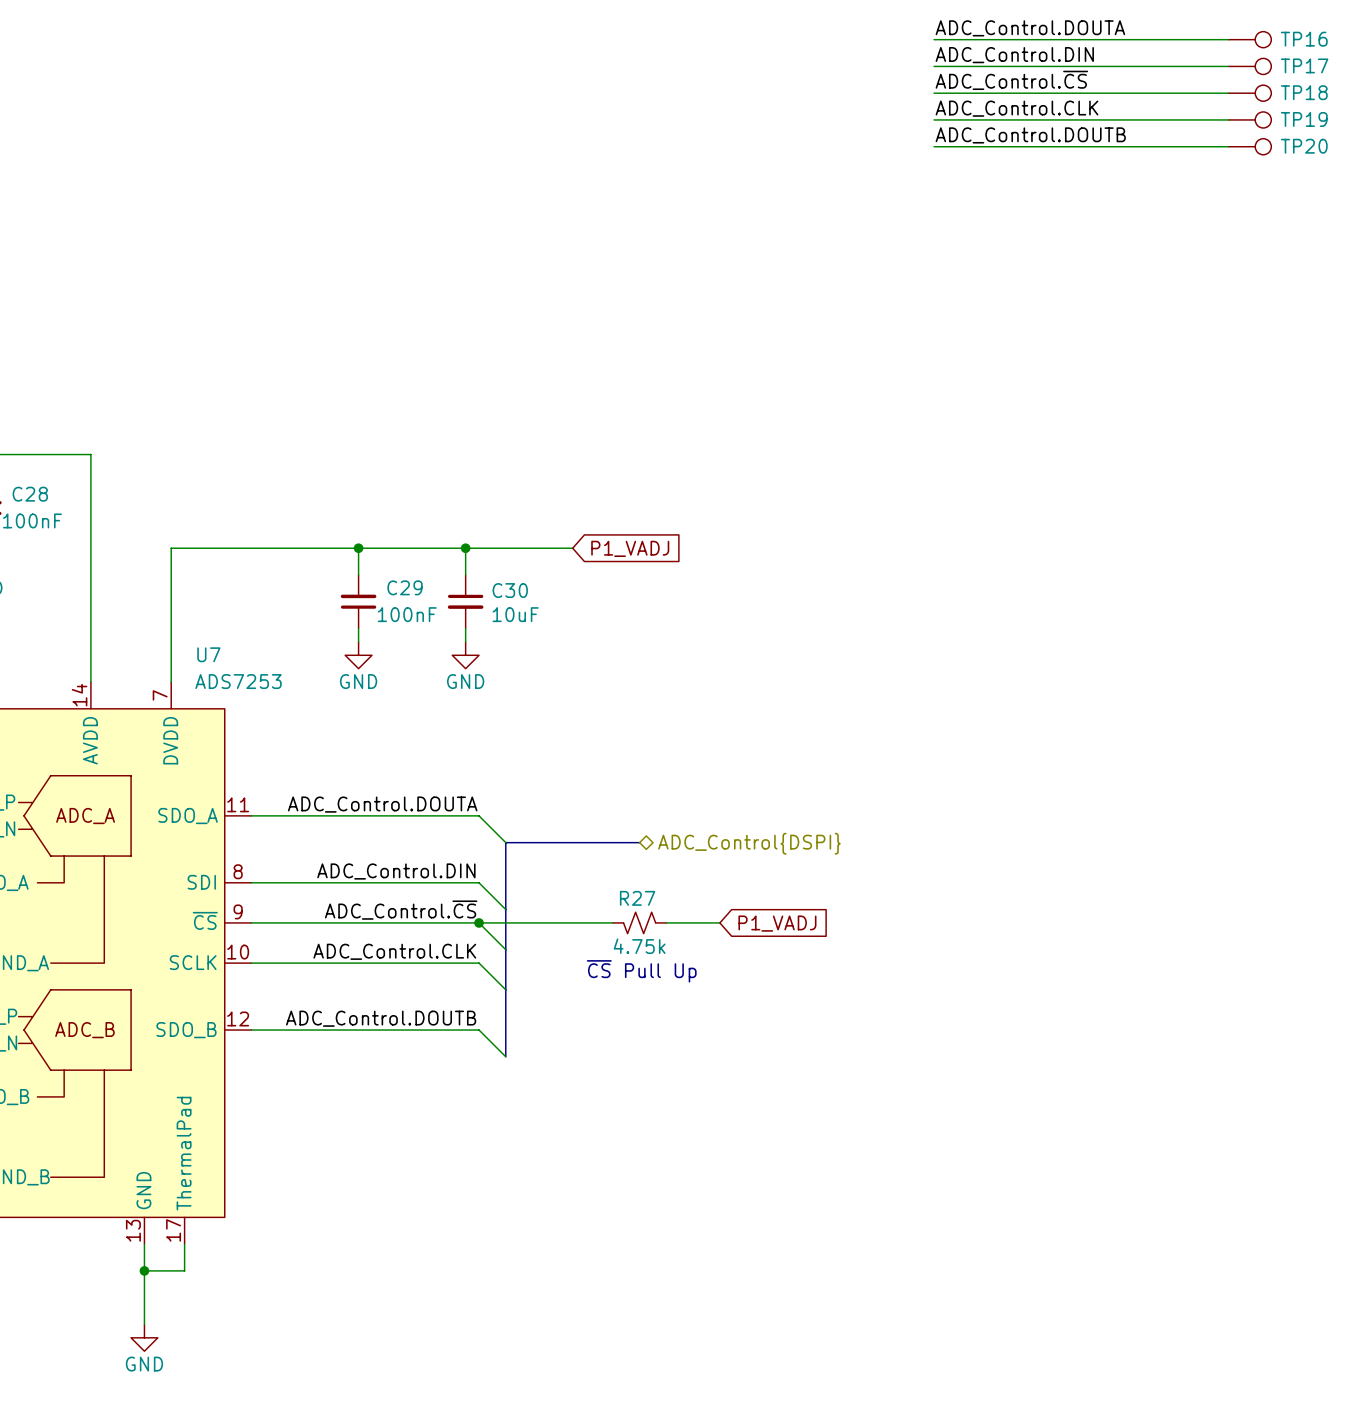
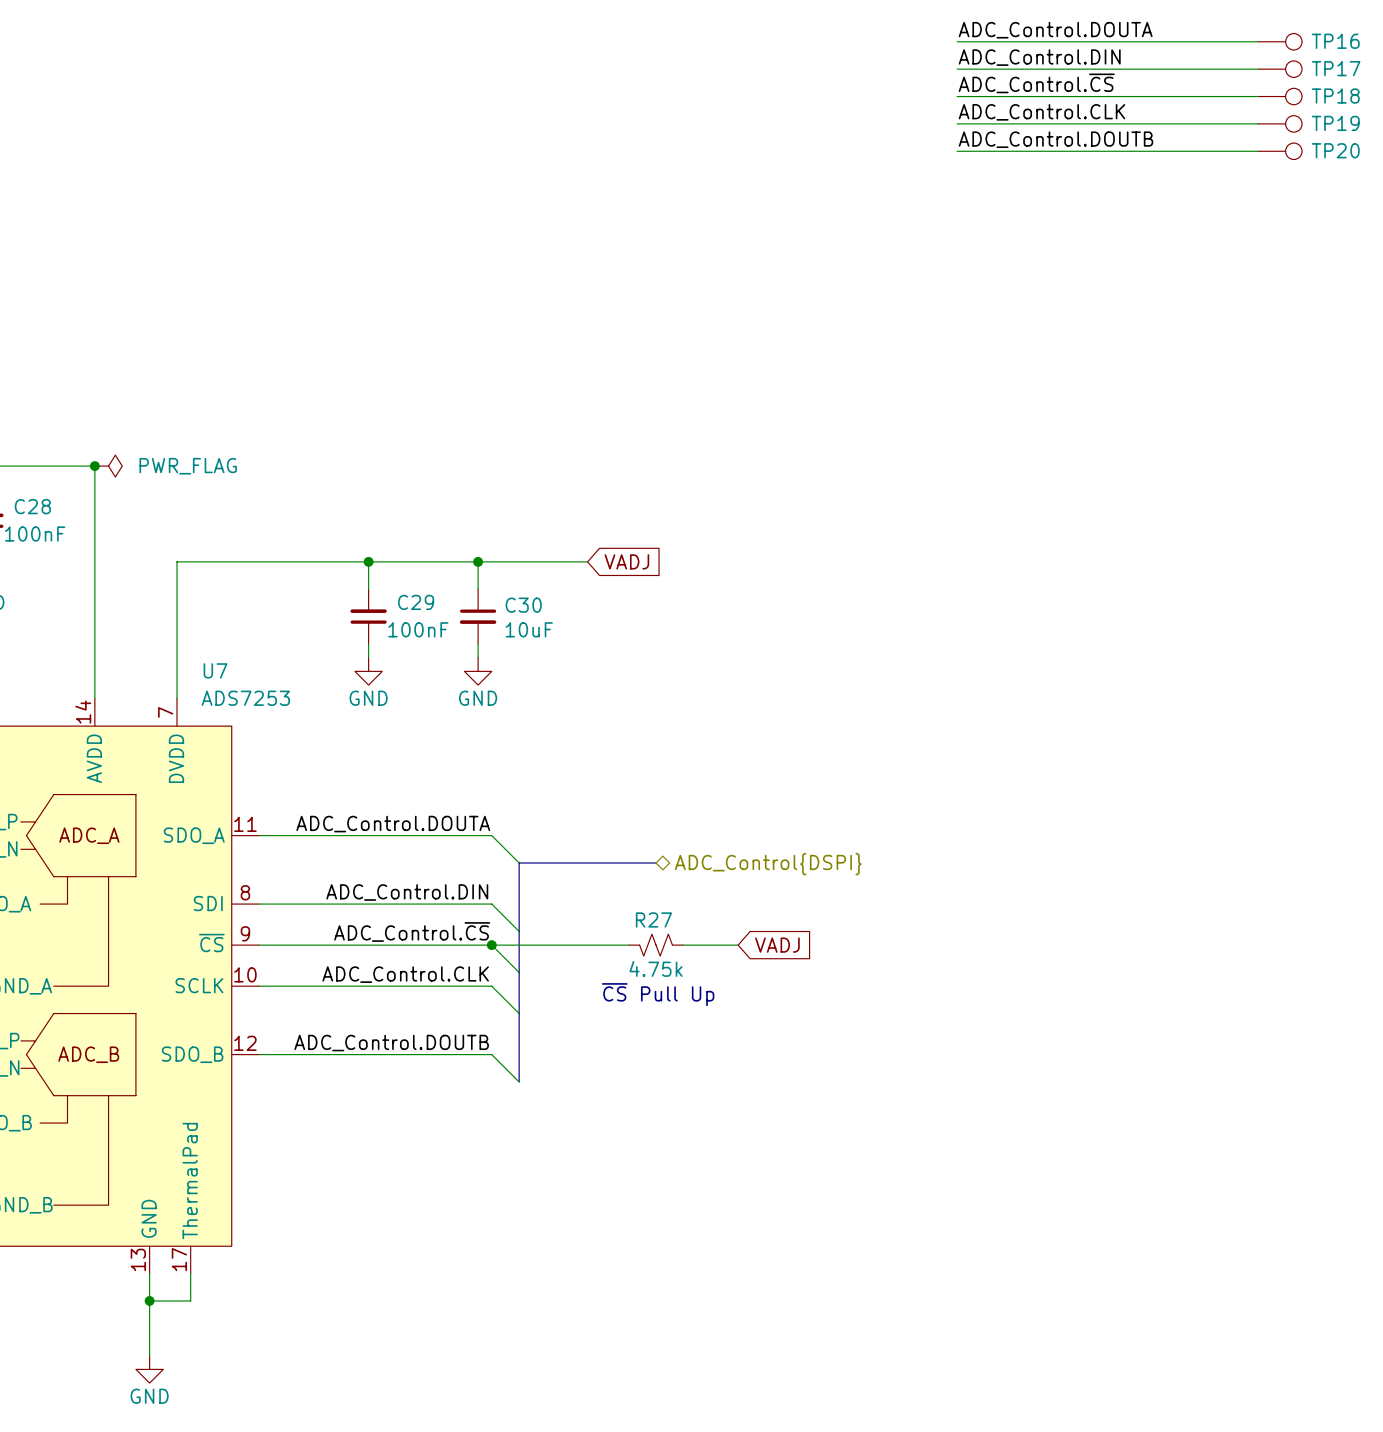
junction: none -> (94, 466)
power symbol: none -> PWR_FLAG (108, 466)
global label: P1_VADJ (630, 548) -> VADJ (626, 561)
global label: P1_VADJ (777, 923) -> VADJ (777, 945)

